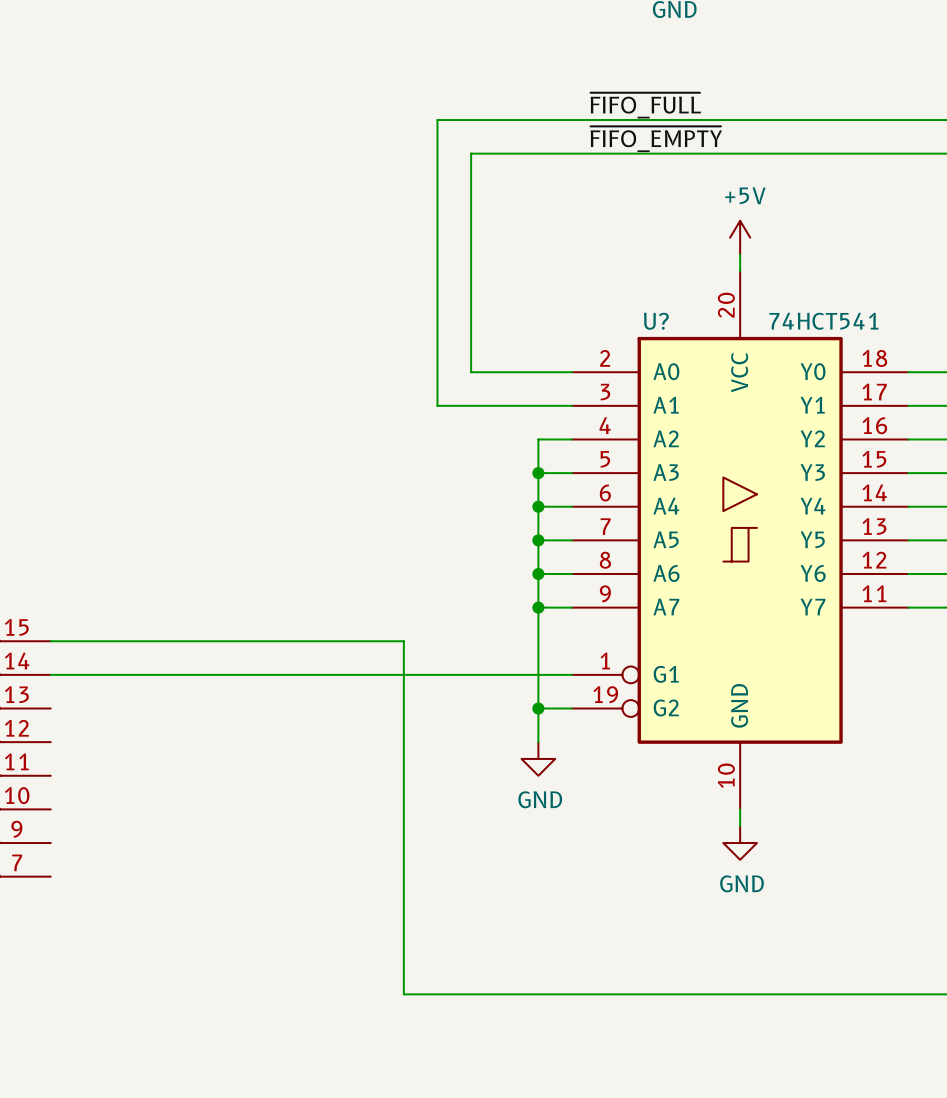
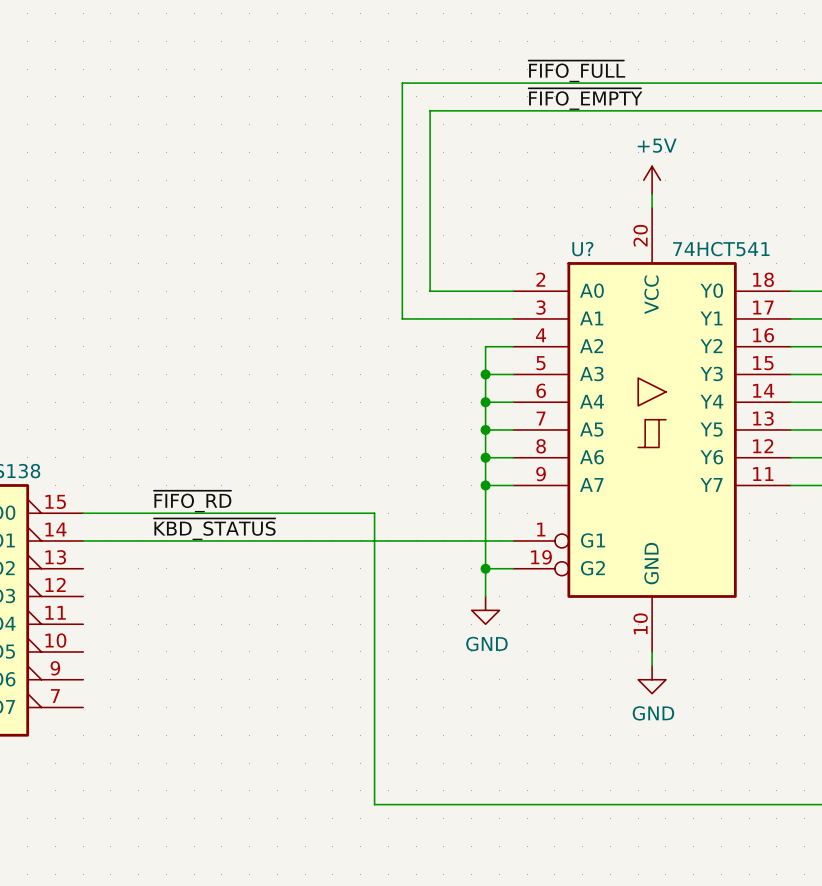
label: none -> ~{FIFO_RD} (192, 501)
label: none -> ~{KBD_STATUS} (214, 529)

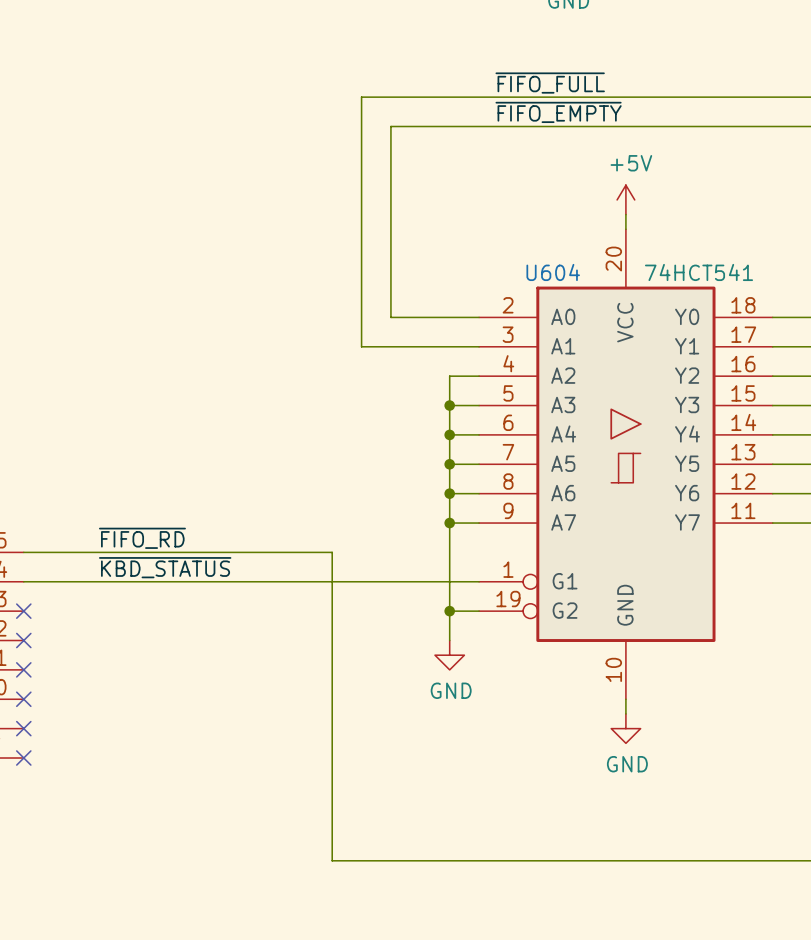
U? name: U? (582, 249) -> U604 (553, 272)
no-connect mark: none -> (23, 611)
no-connect mark: none -> (23, 640)
no-connect mark: none -> (23, 669)
no-connect mark: none -> (23, 699)
no-connect mark: none -> (23, 728)
no-connect mark: none -> (23, 758)

